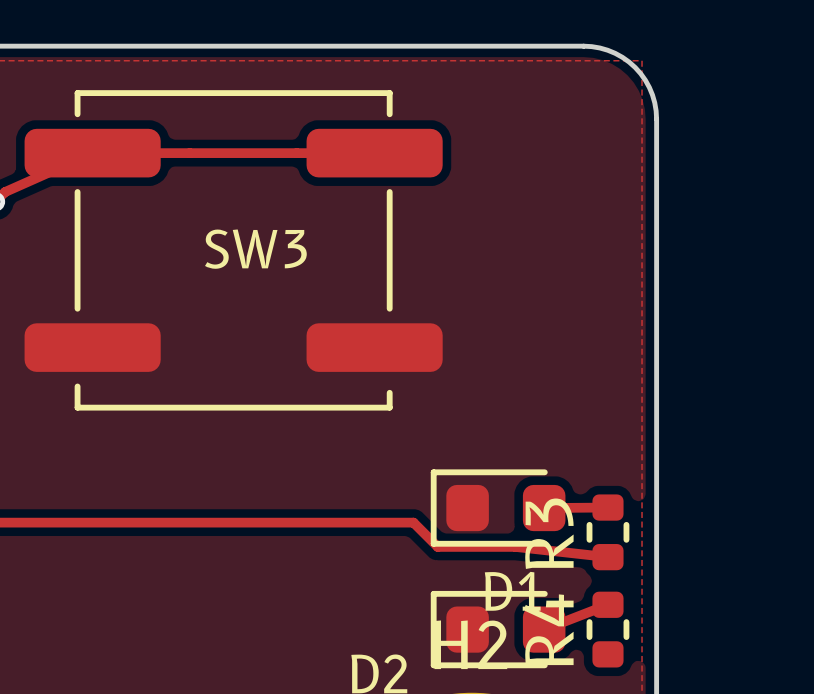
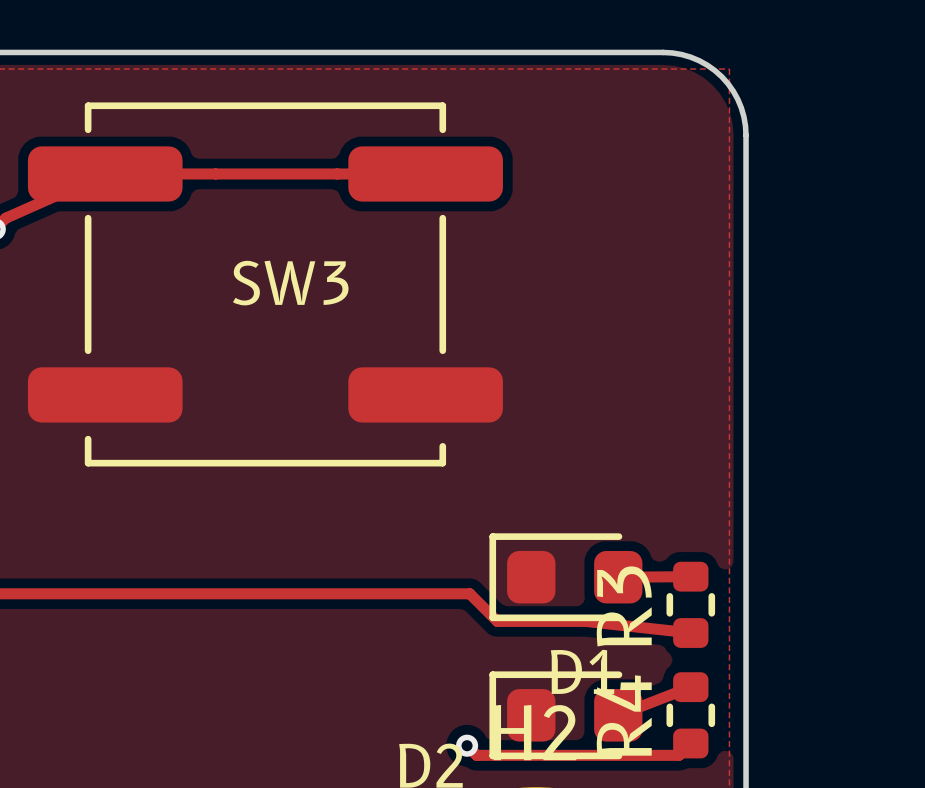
track: none -> (690, 743) (678, 755) (476, 755) (467, 745)
via: none -> (467, 745)

